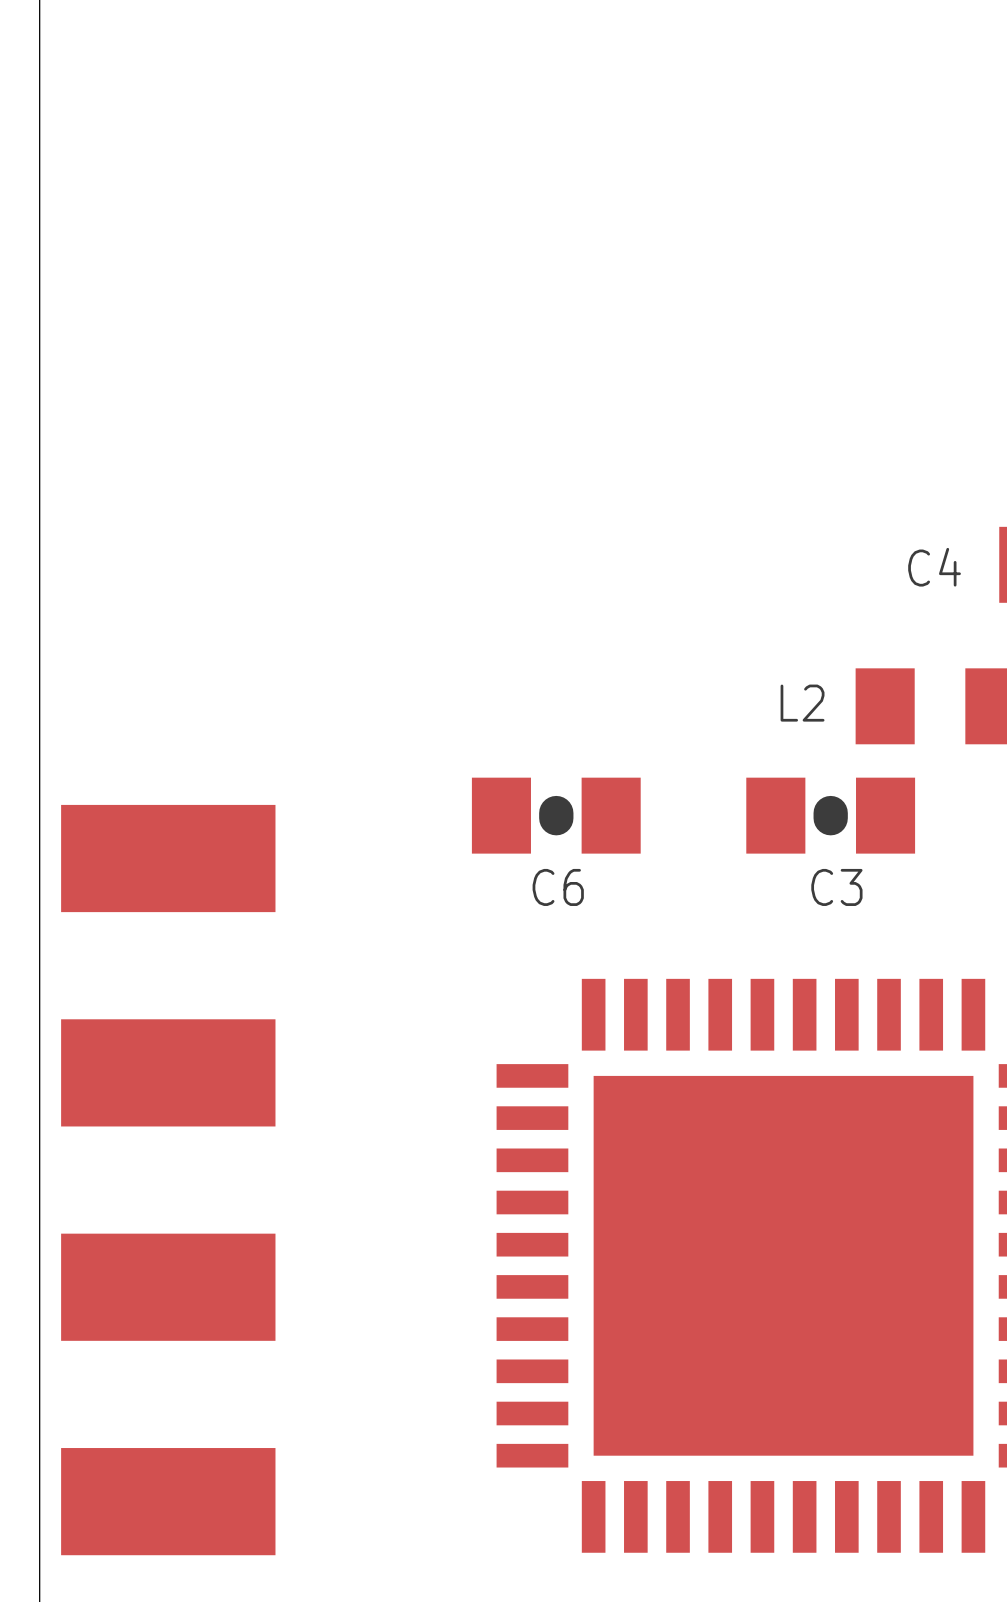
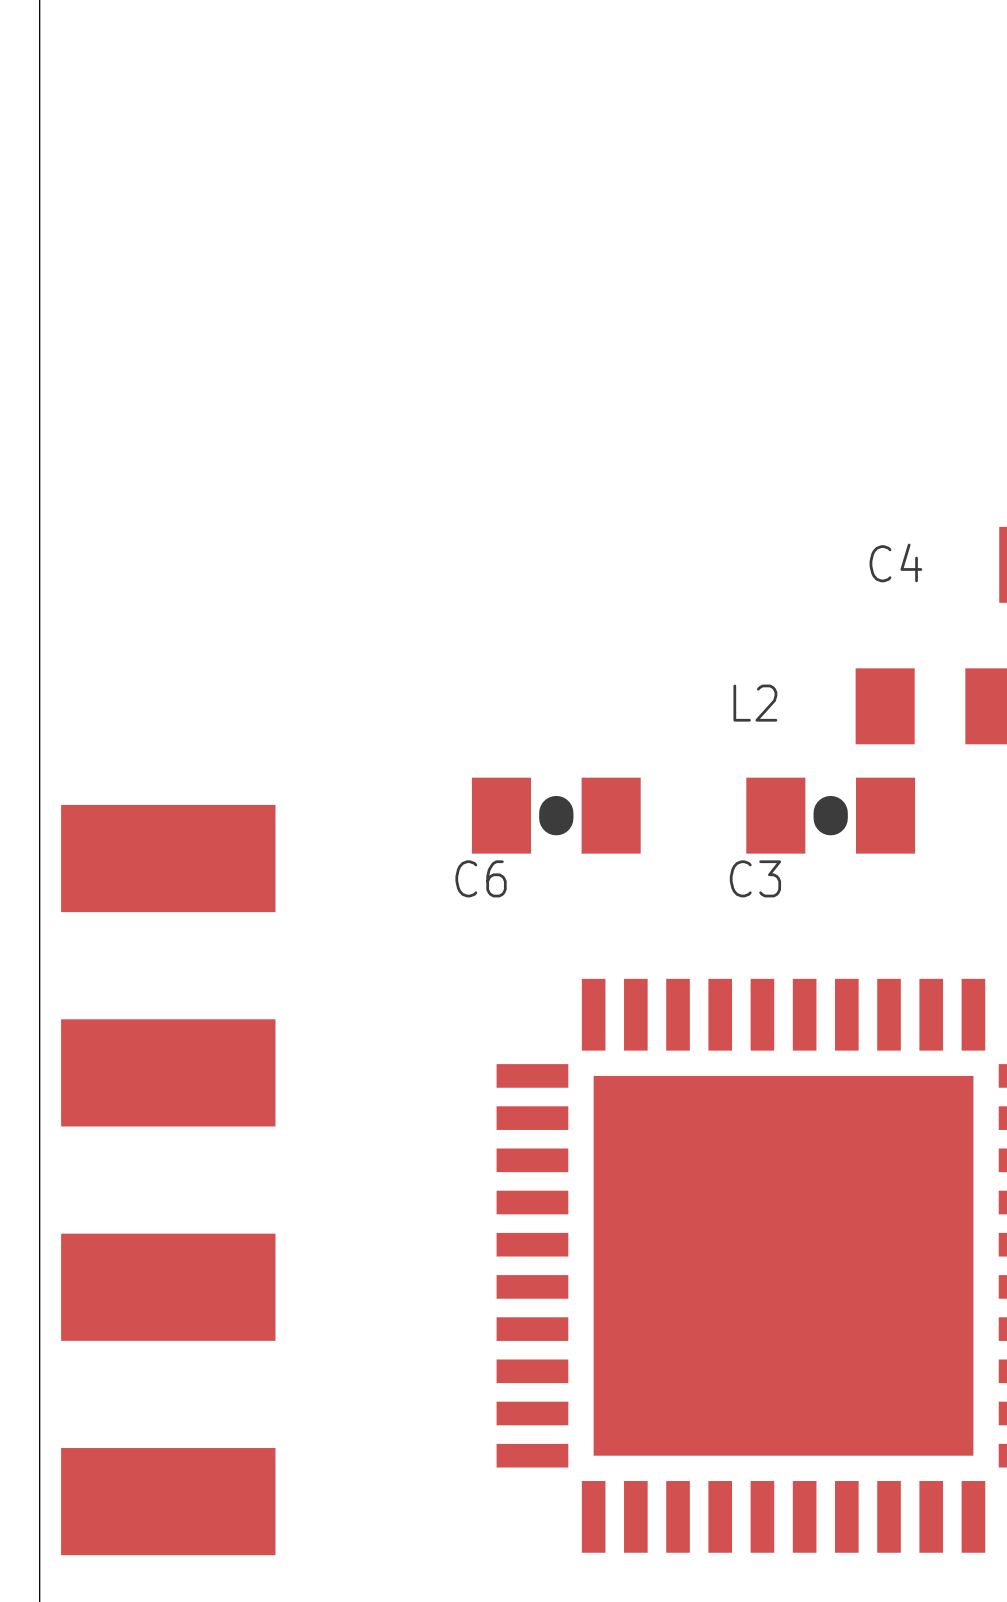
C4 name position: C4 (934, 567) -> C4 (895, 562)
L2 name position: L2 (802, 703) -> L2 (755, 703)
C6 name position: C6 (558, 887) -> C6 (481, 878)
C3 name position: C3 (836, 887) -> C3 (755, 878)

